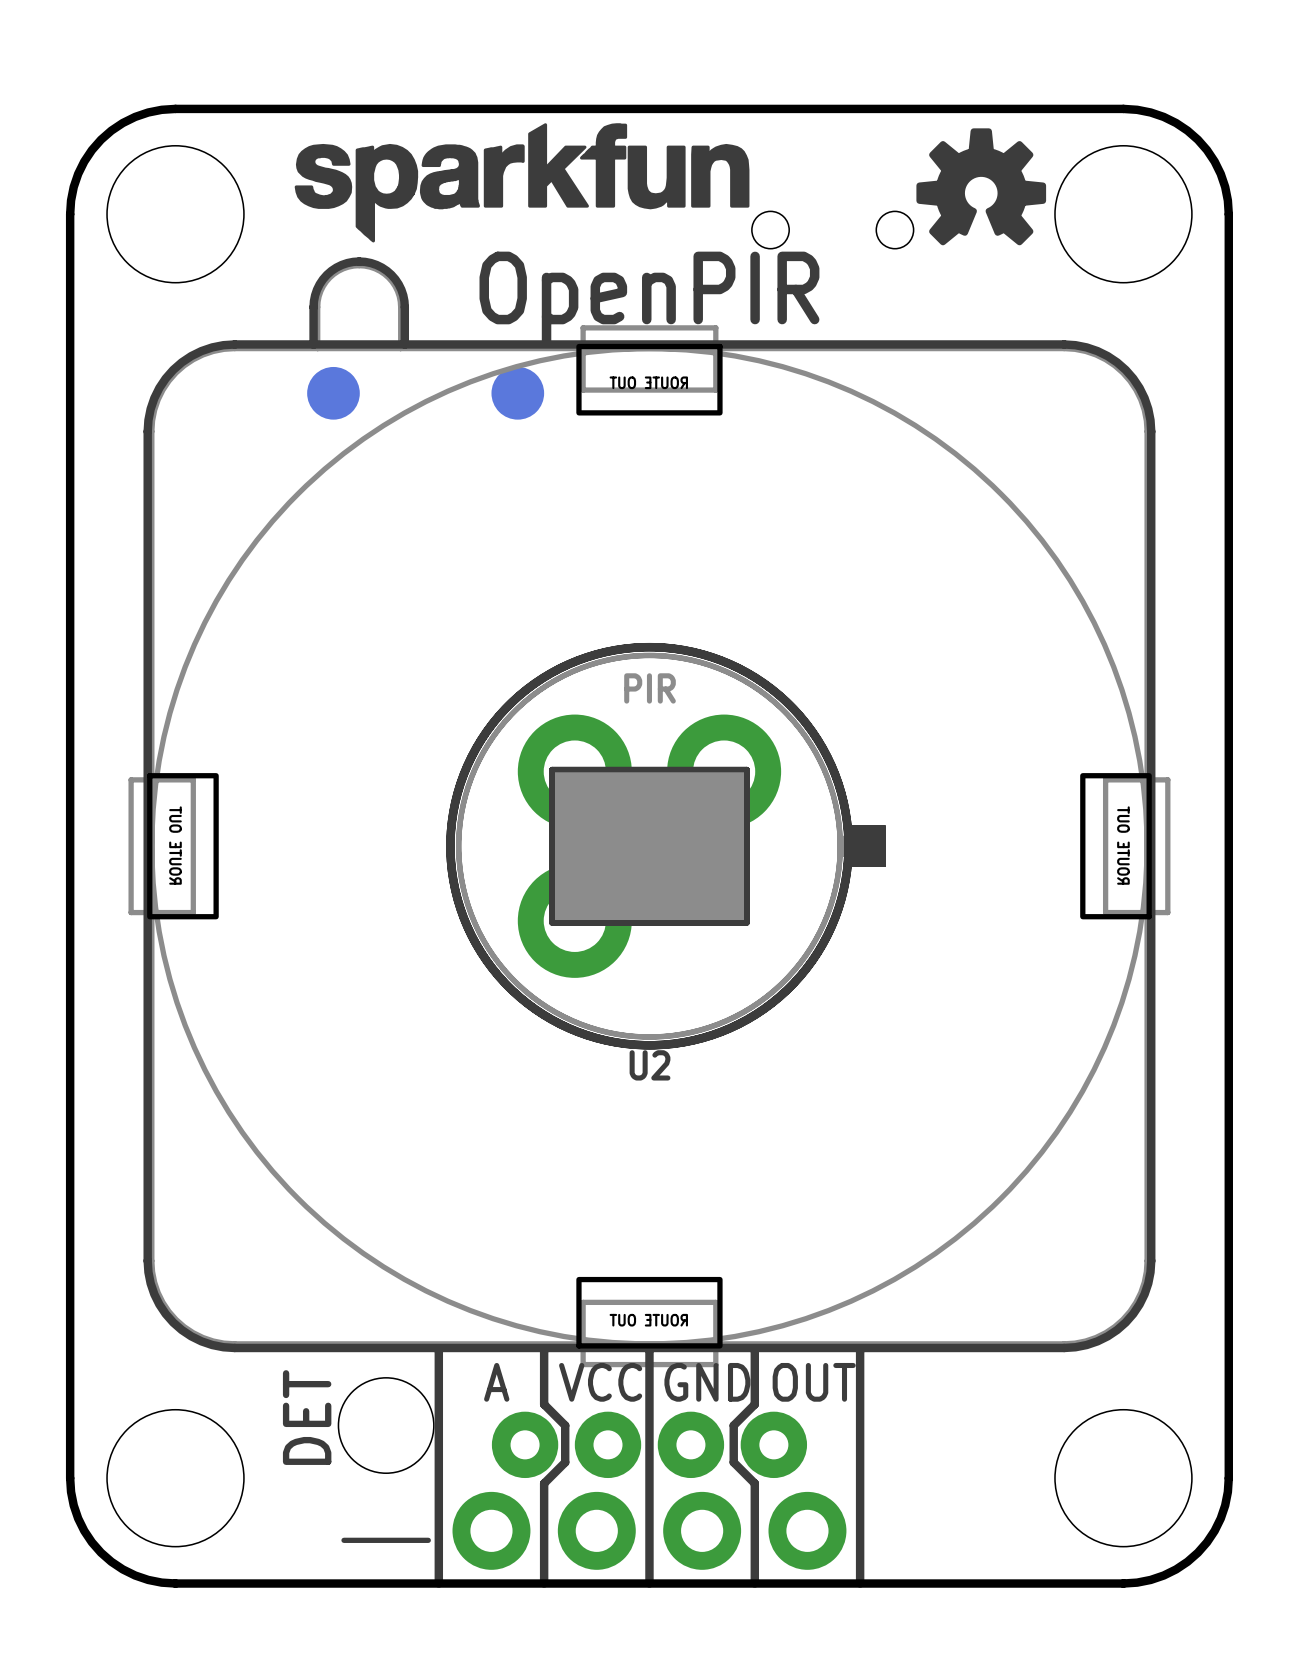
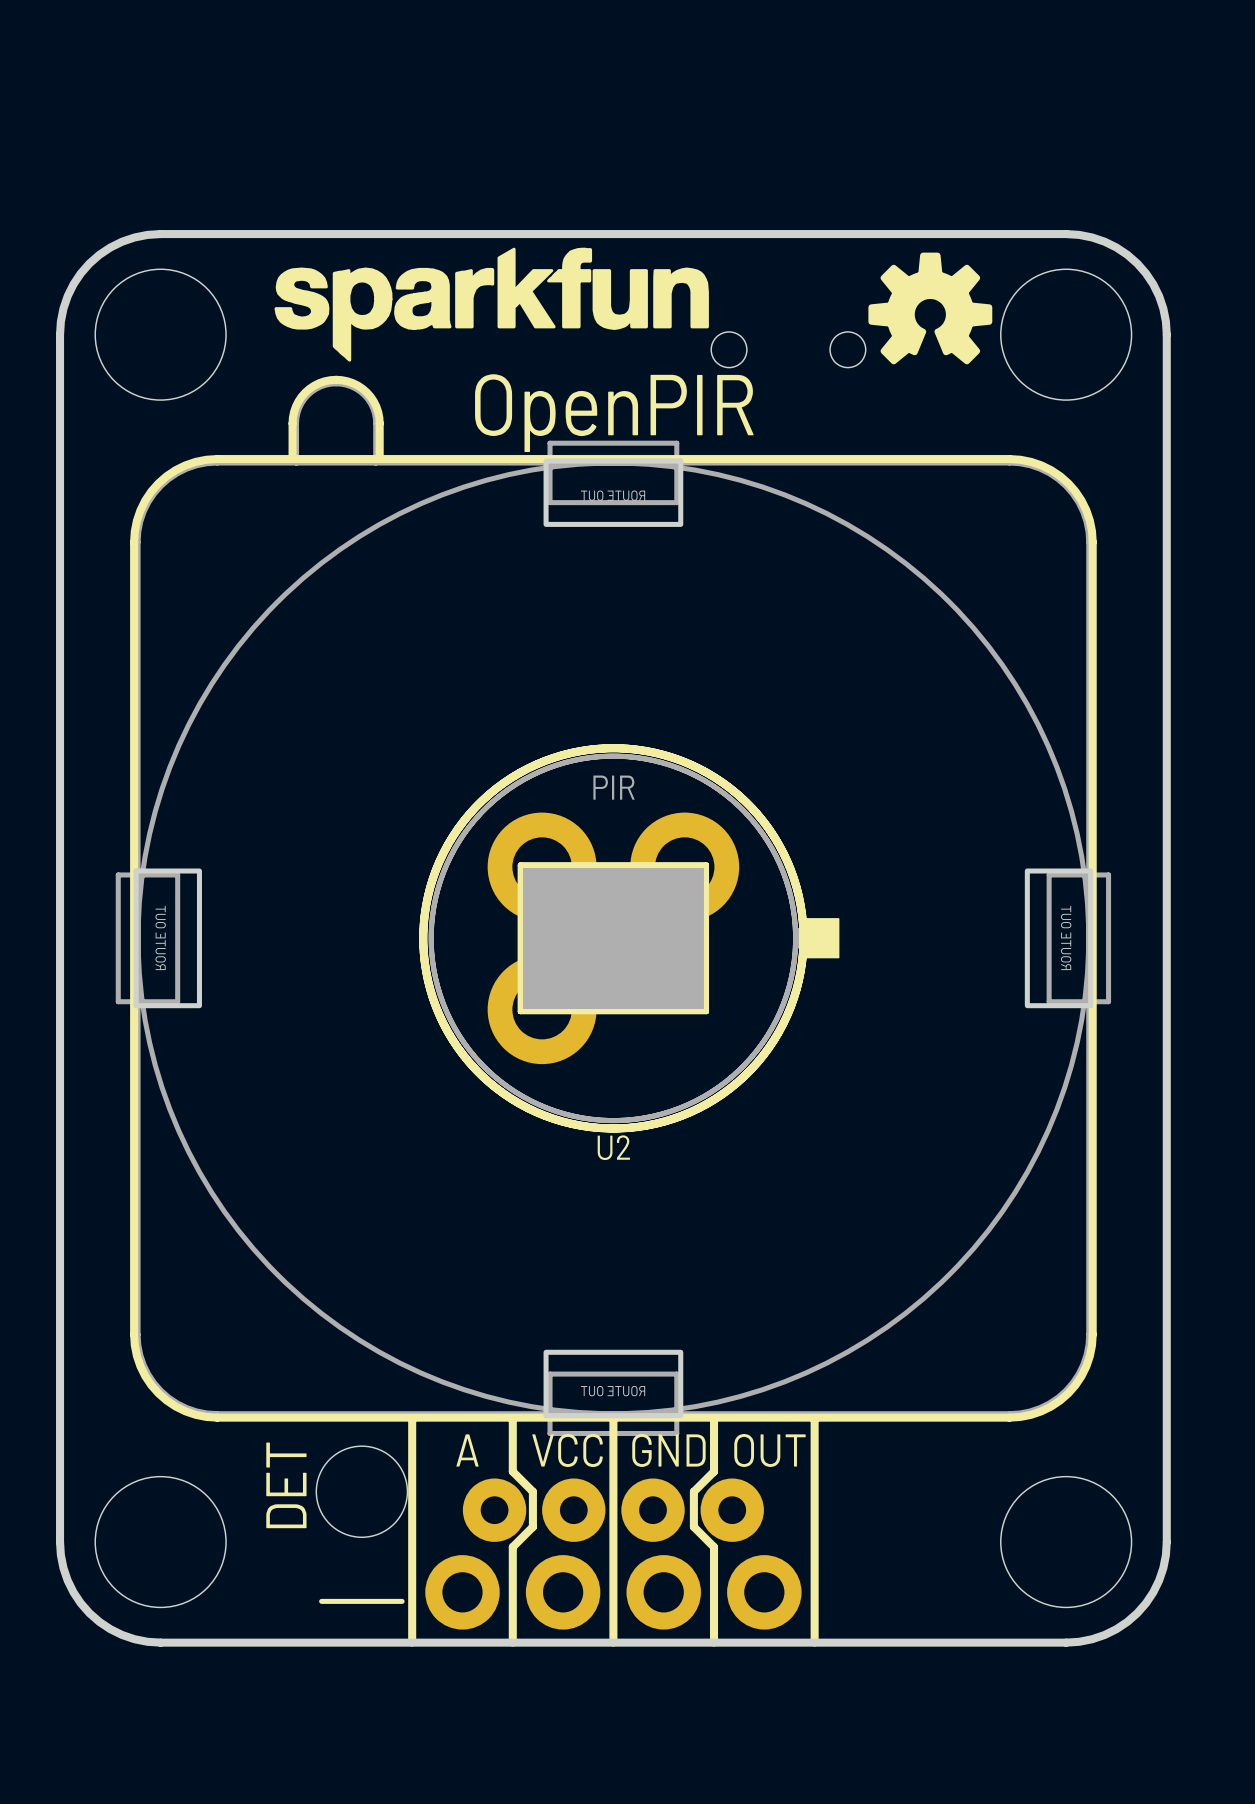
part: (333, 393) -> none
part: (517, 393) -> none

